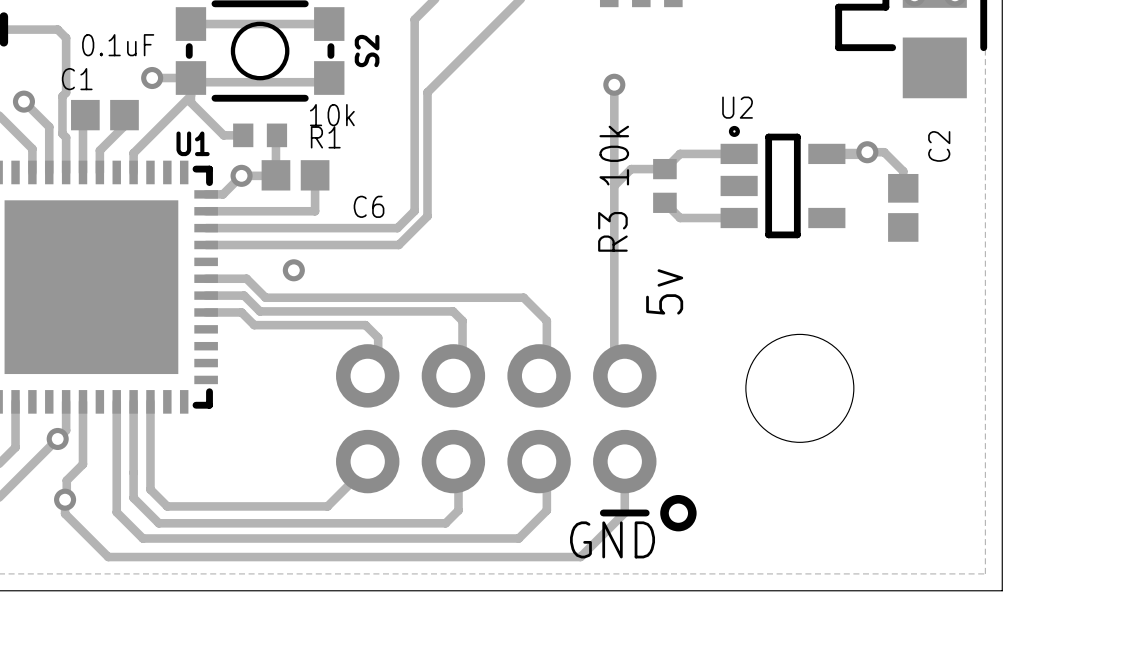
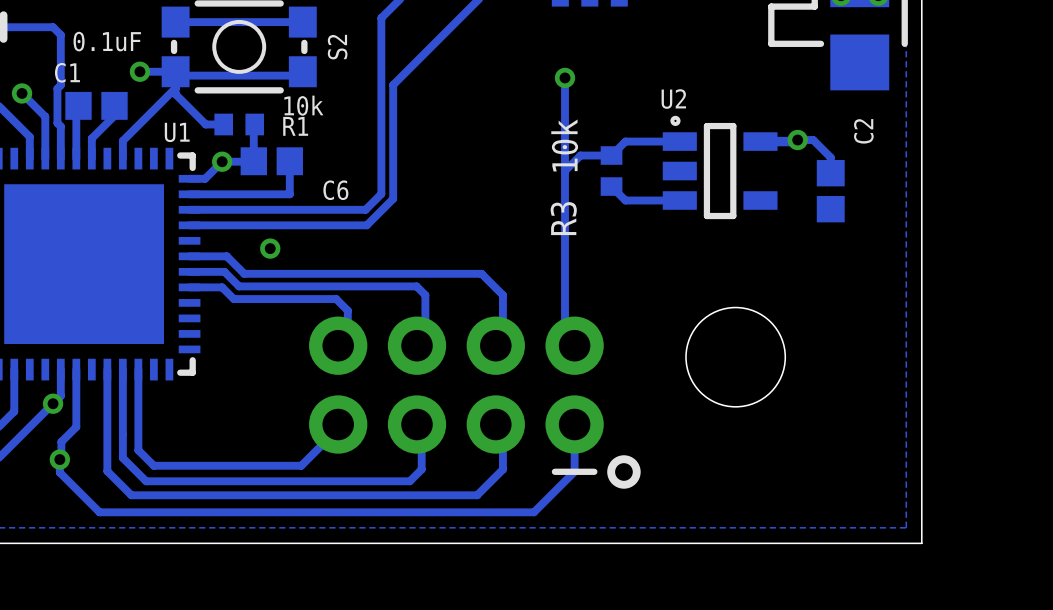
text: 5v (664, 291) -> none
text: GND (612, 539) -> none

